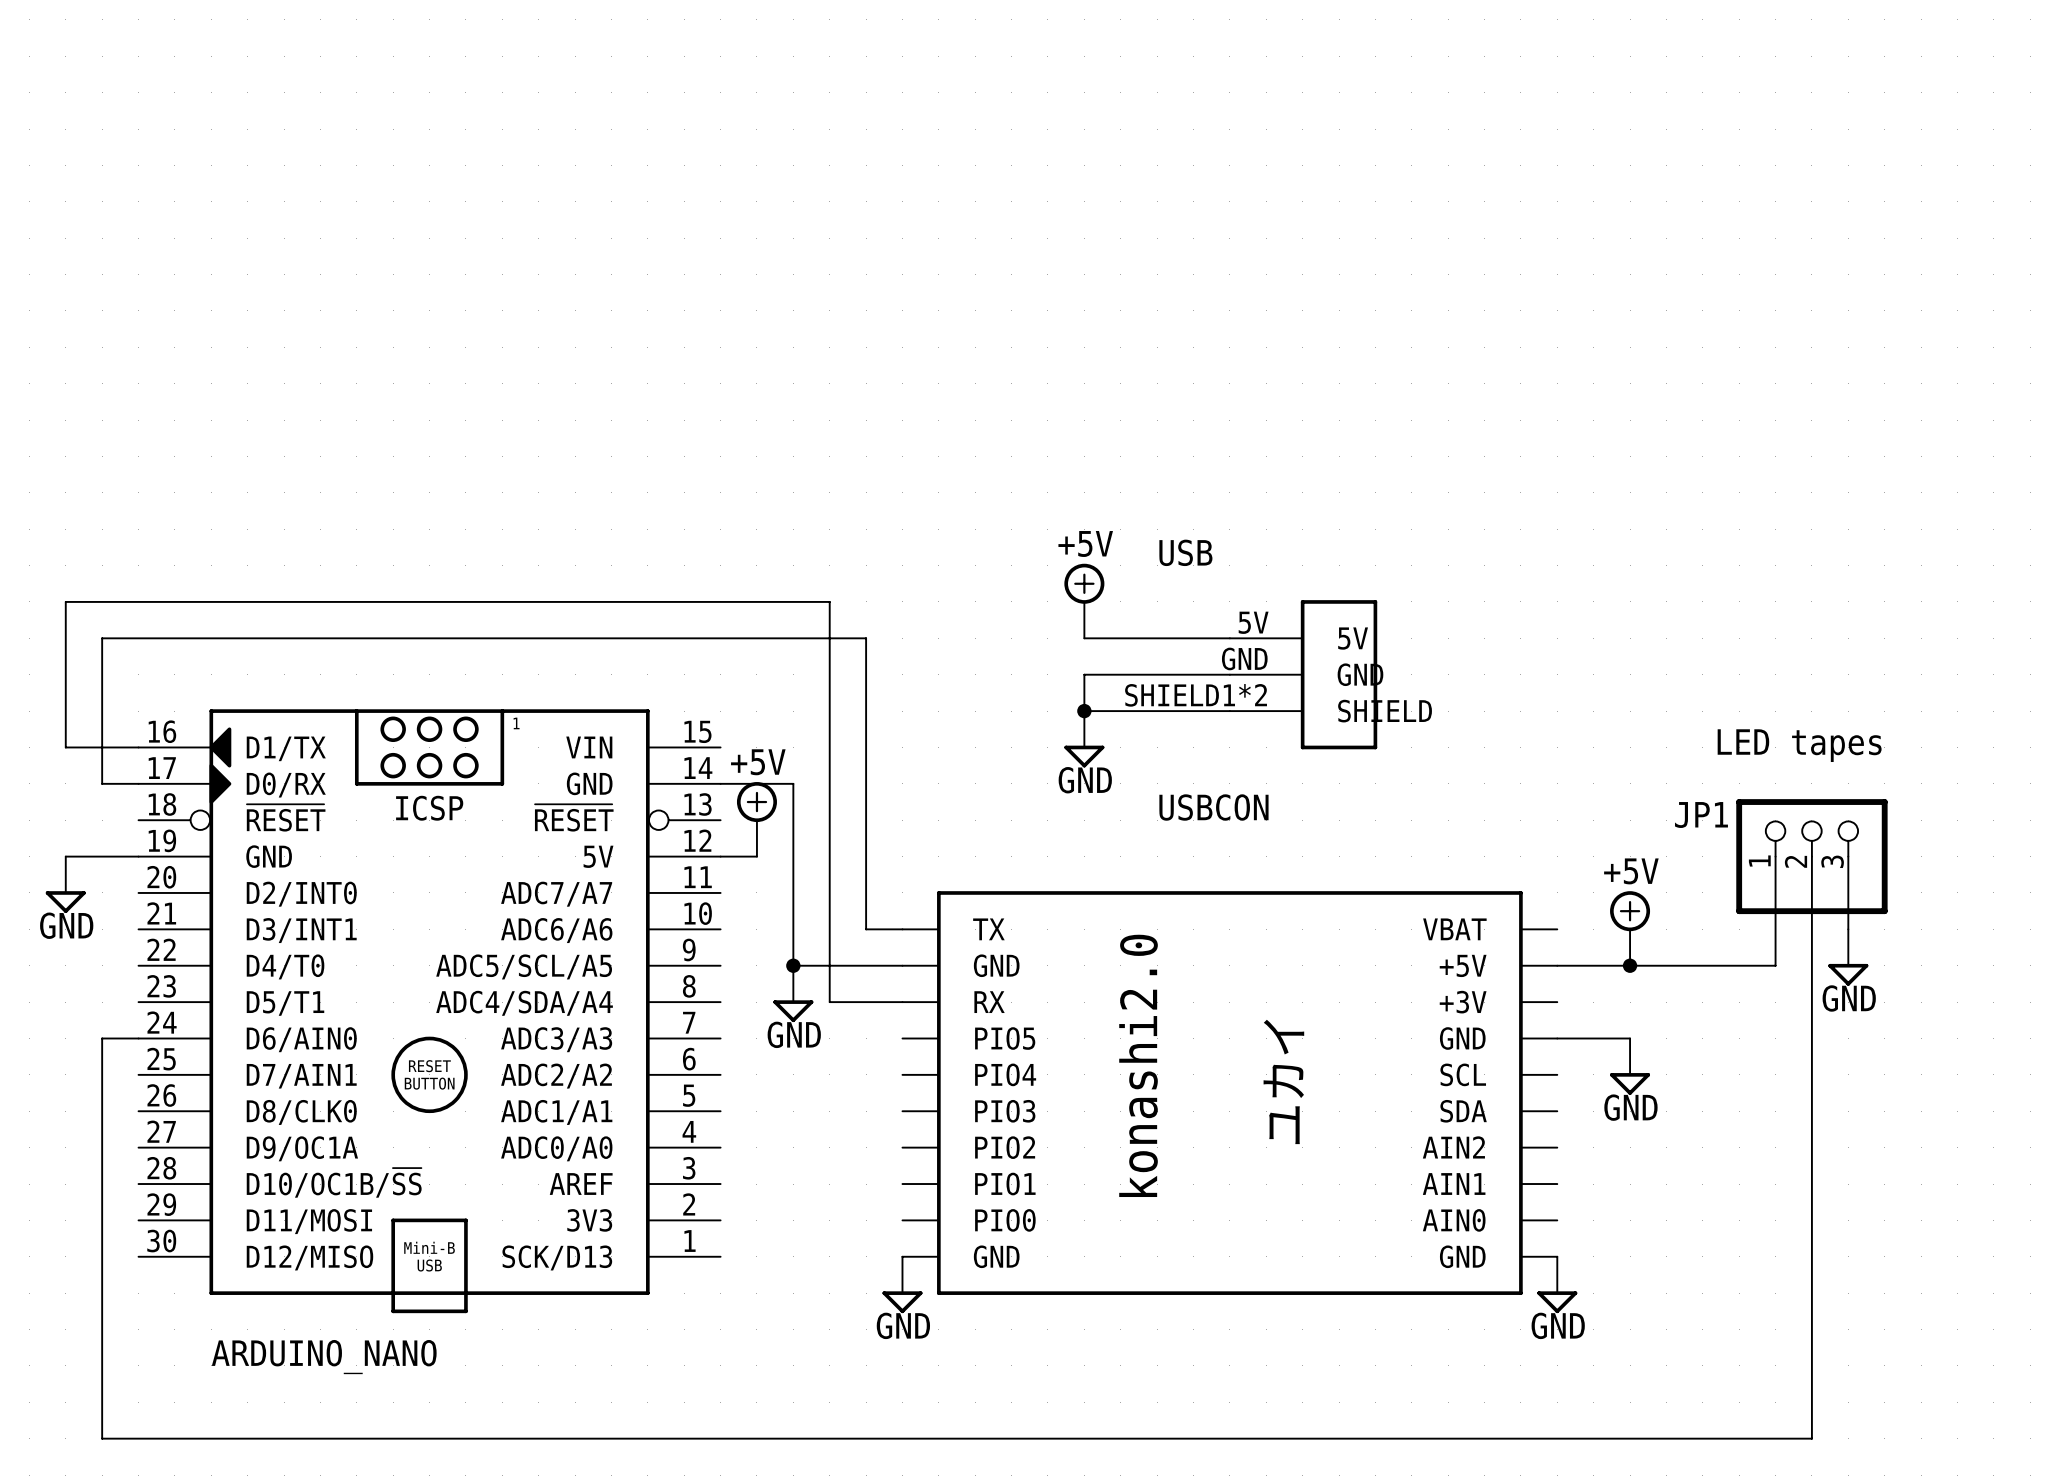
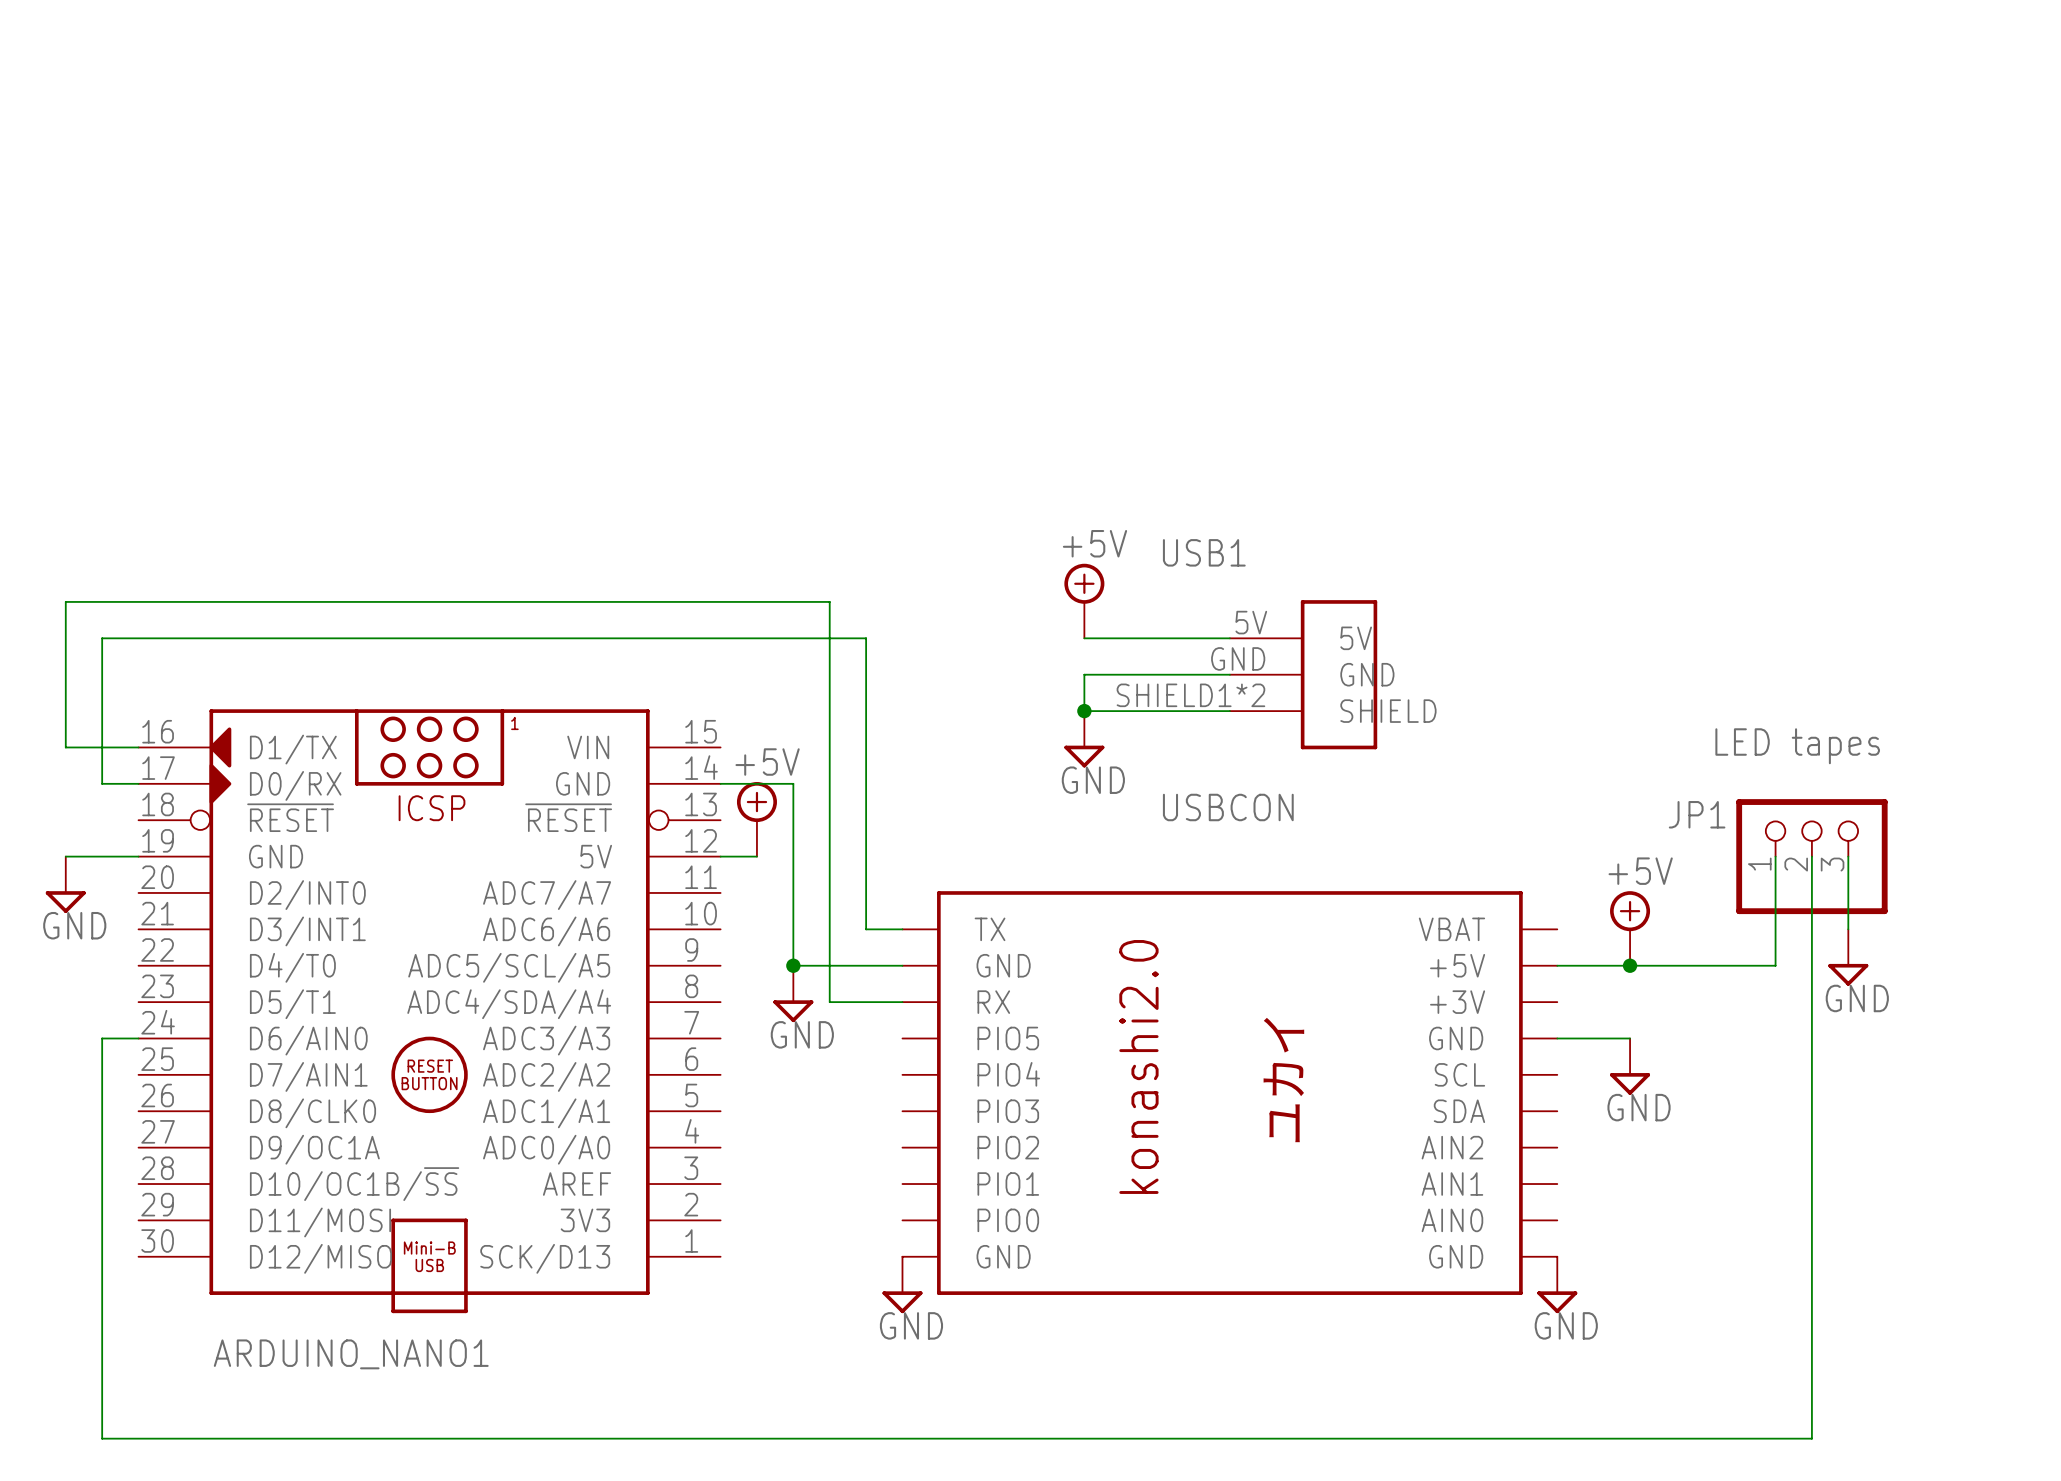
USB name: USB (1185, 552) -> USB1 (1204, 552)
ARDUINO_NANO name: ARDUINO_NANO (324, 1357) -> ARDUINO_NANO1 (351, 1354)

